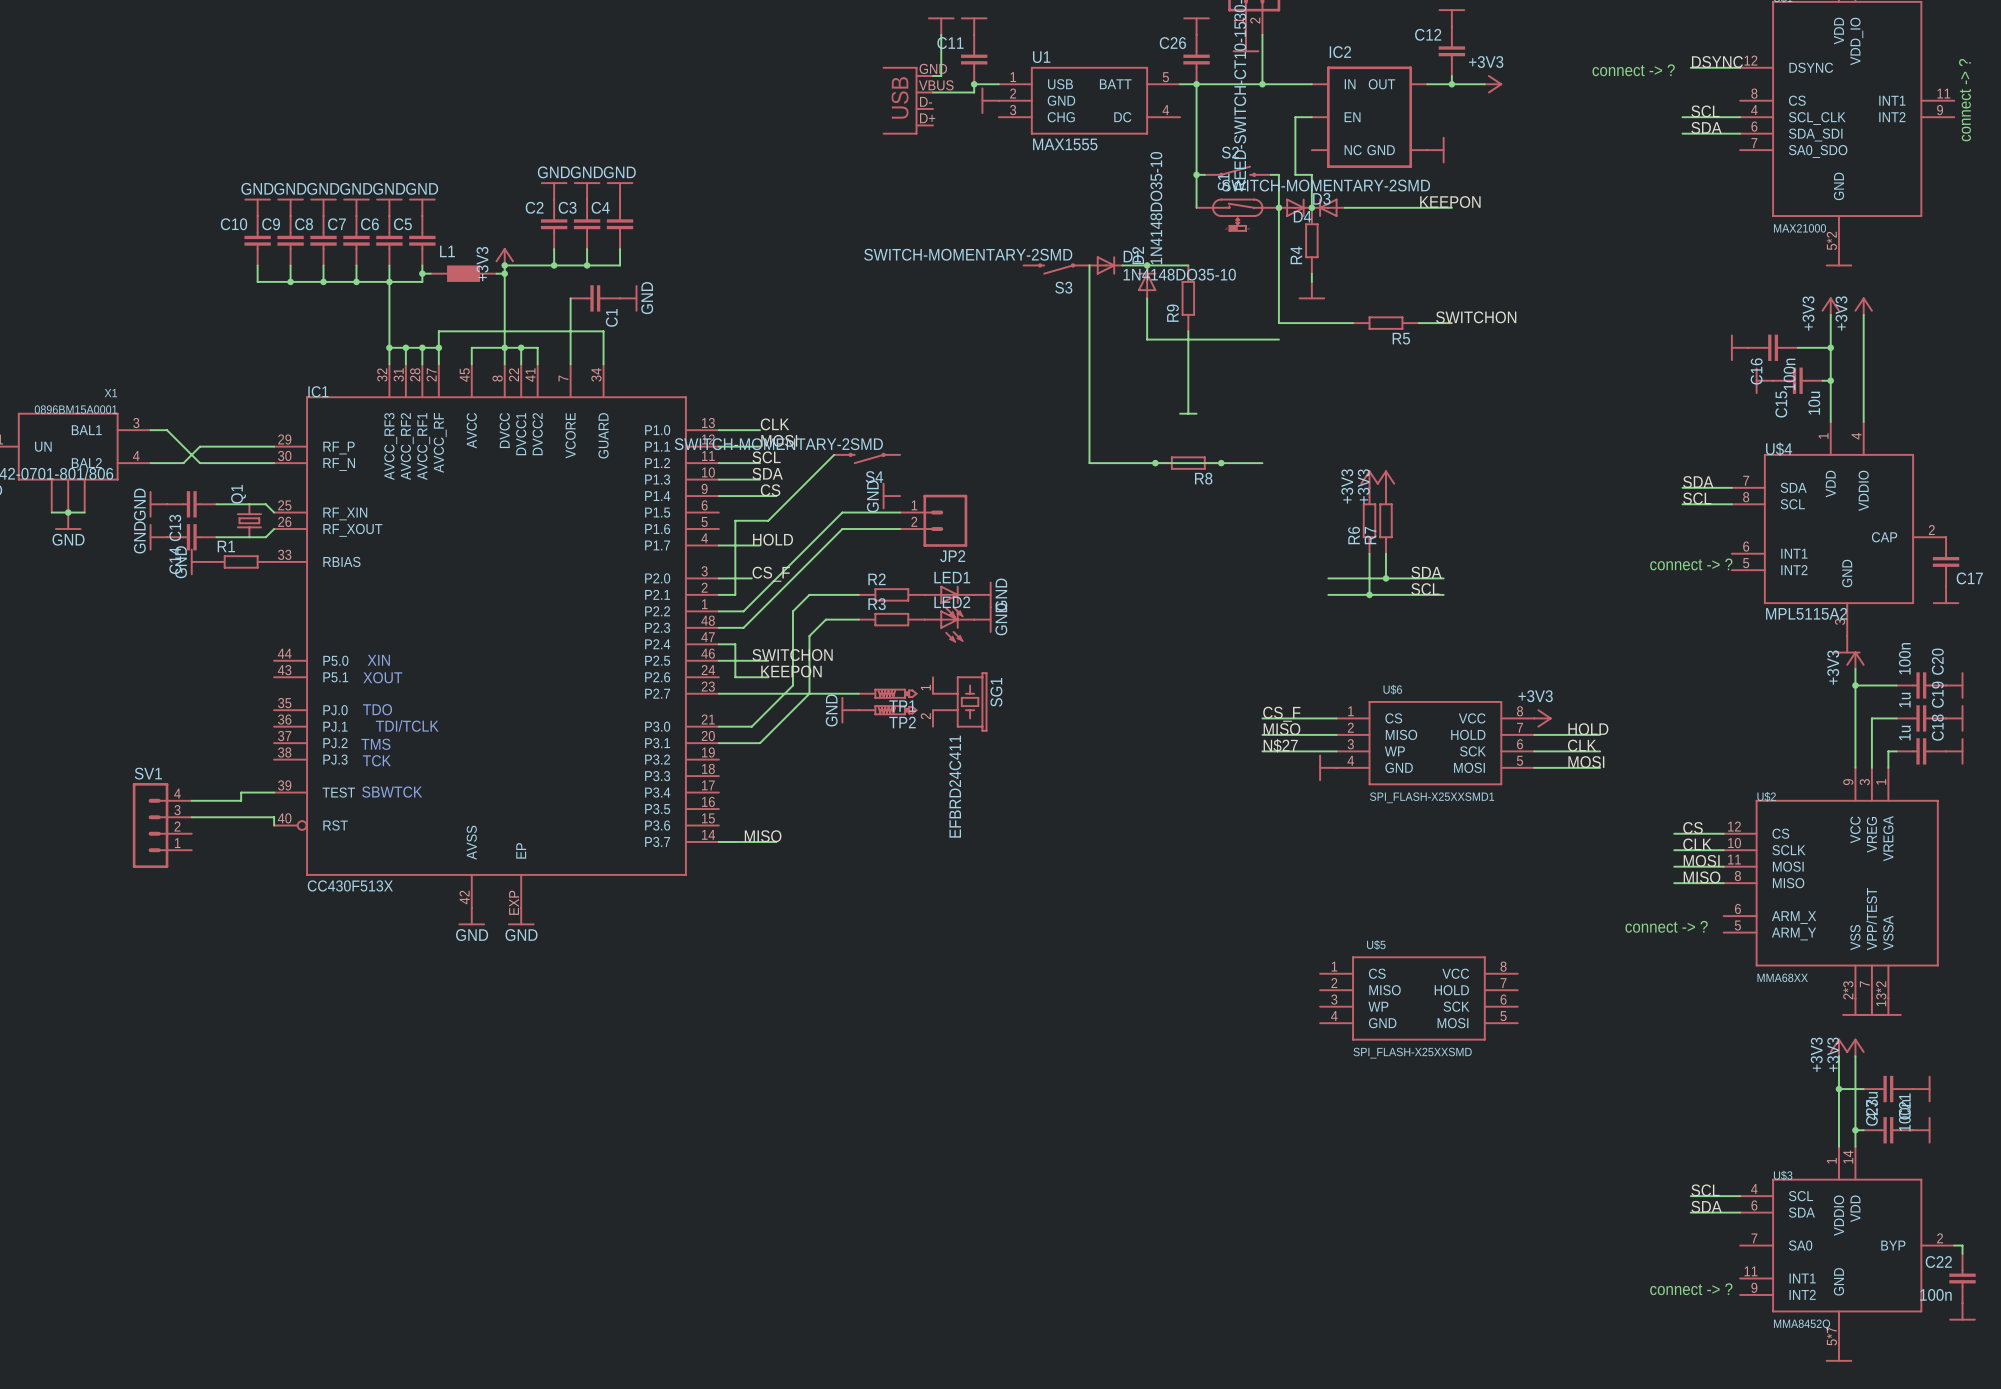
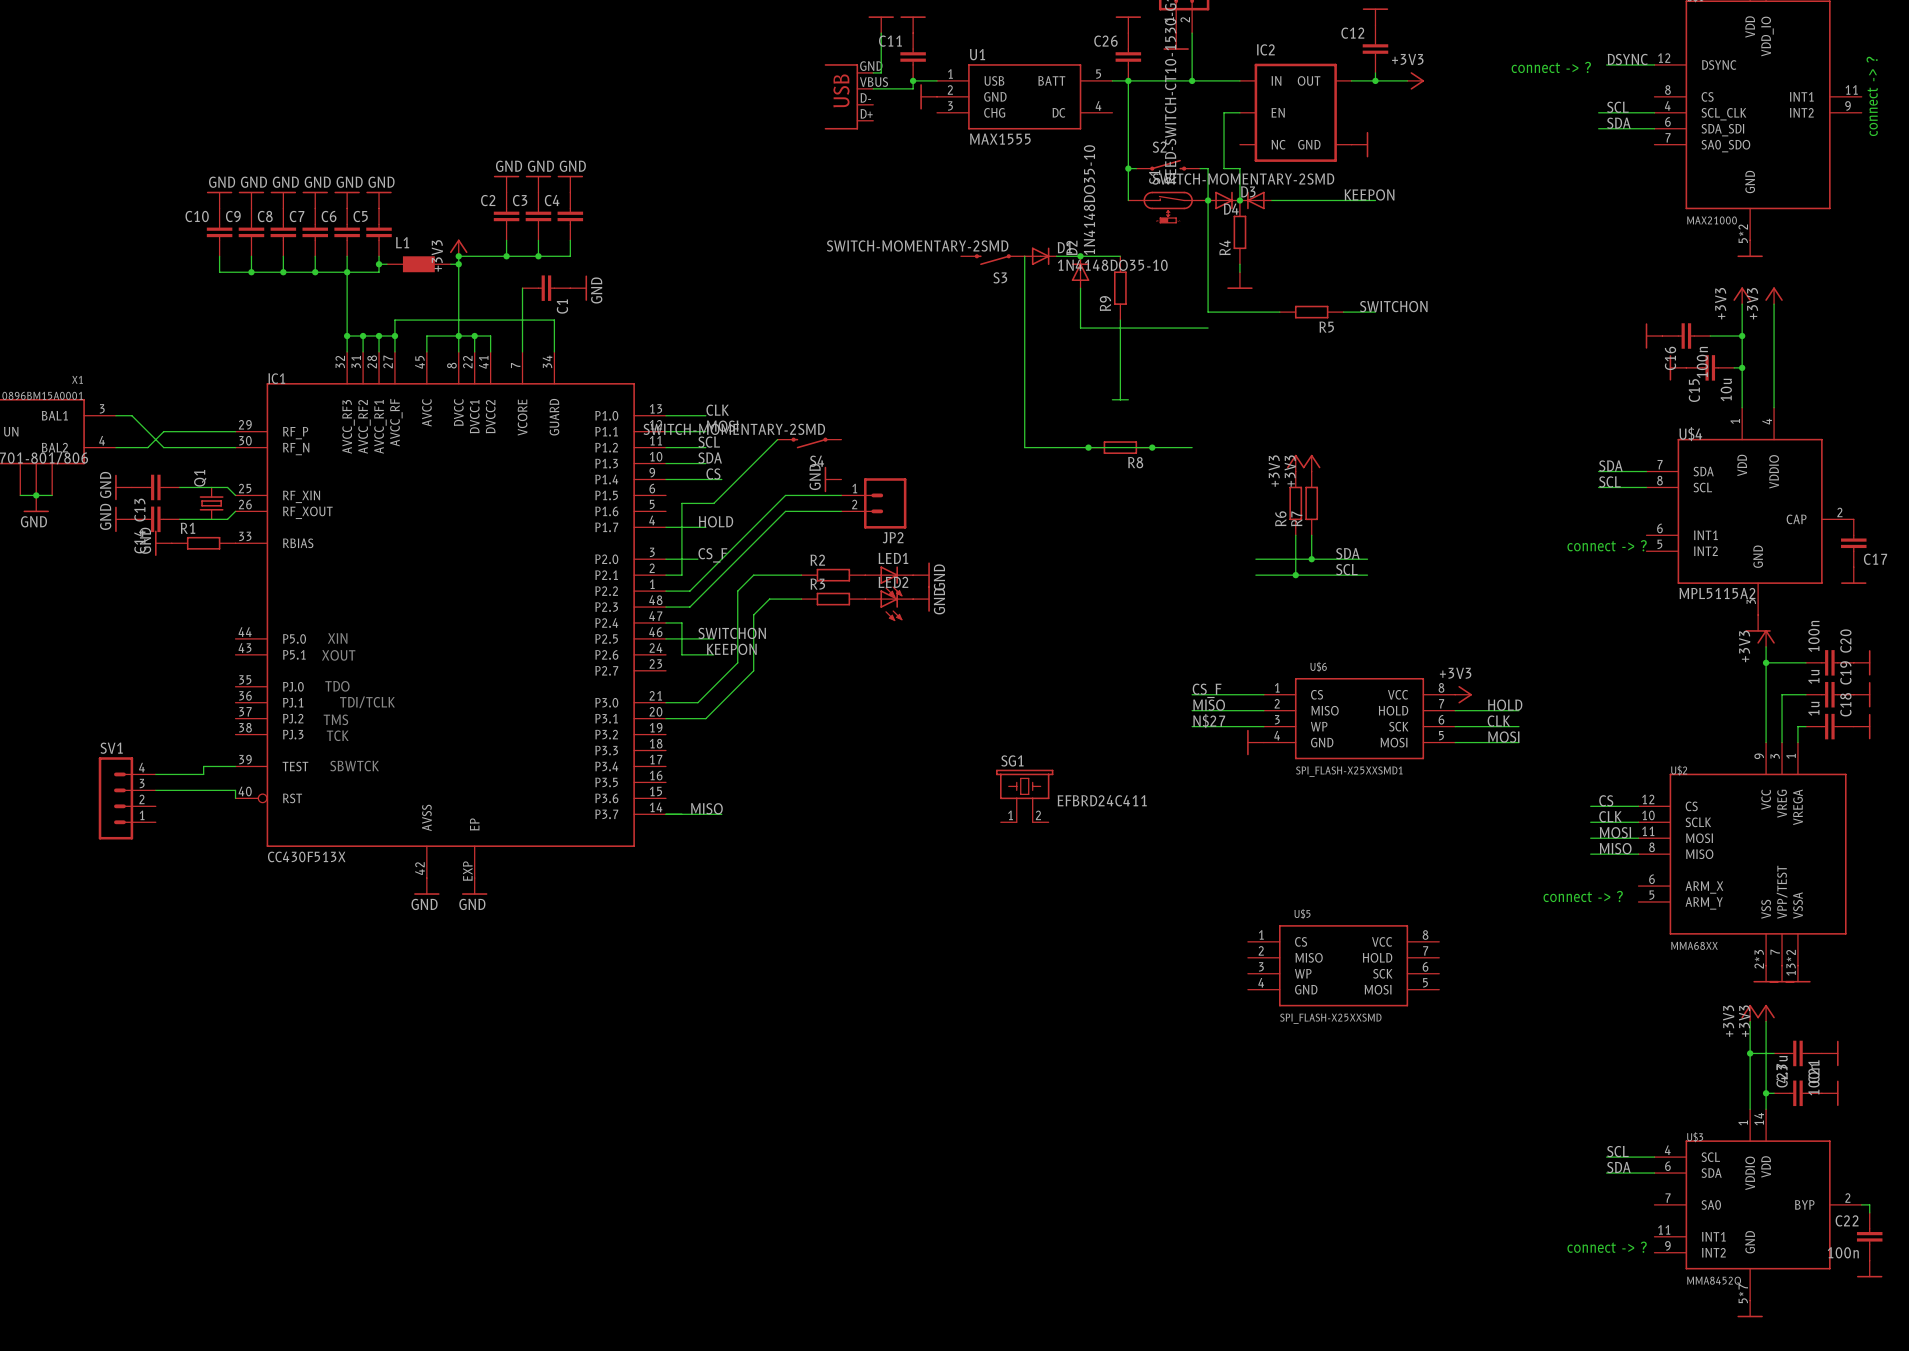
wire: (718, 693) (858, 693) -> none
TP1: (887, 693) -> none
SG1 rotation: 0° (959, 701) -> 90° counterclockwise (1024, 796)
SG1 position: (959, 701) -> (1024, 796)
power symbol: GND (850, 710) -> none
TP2: (887, 710) -> none

